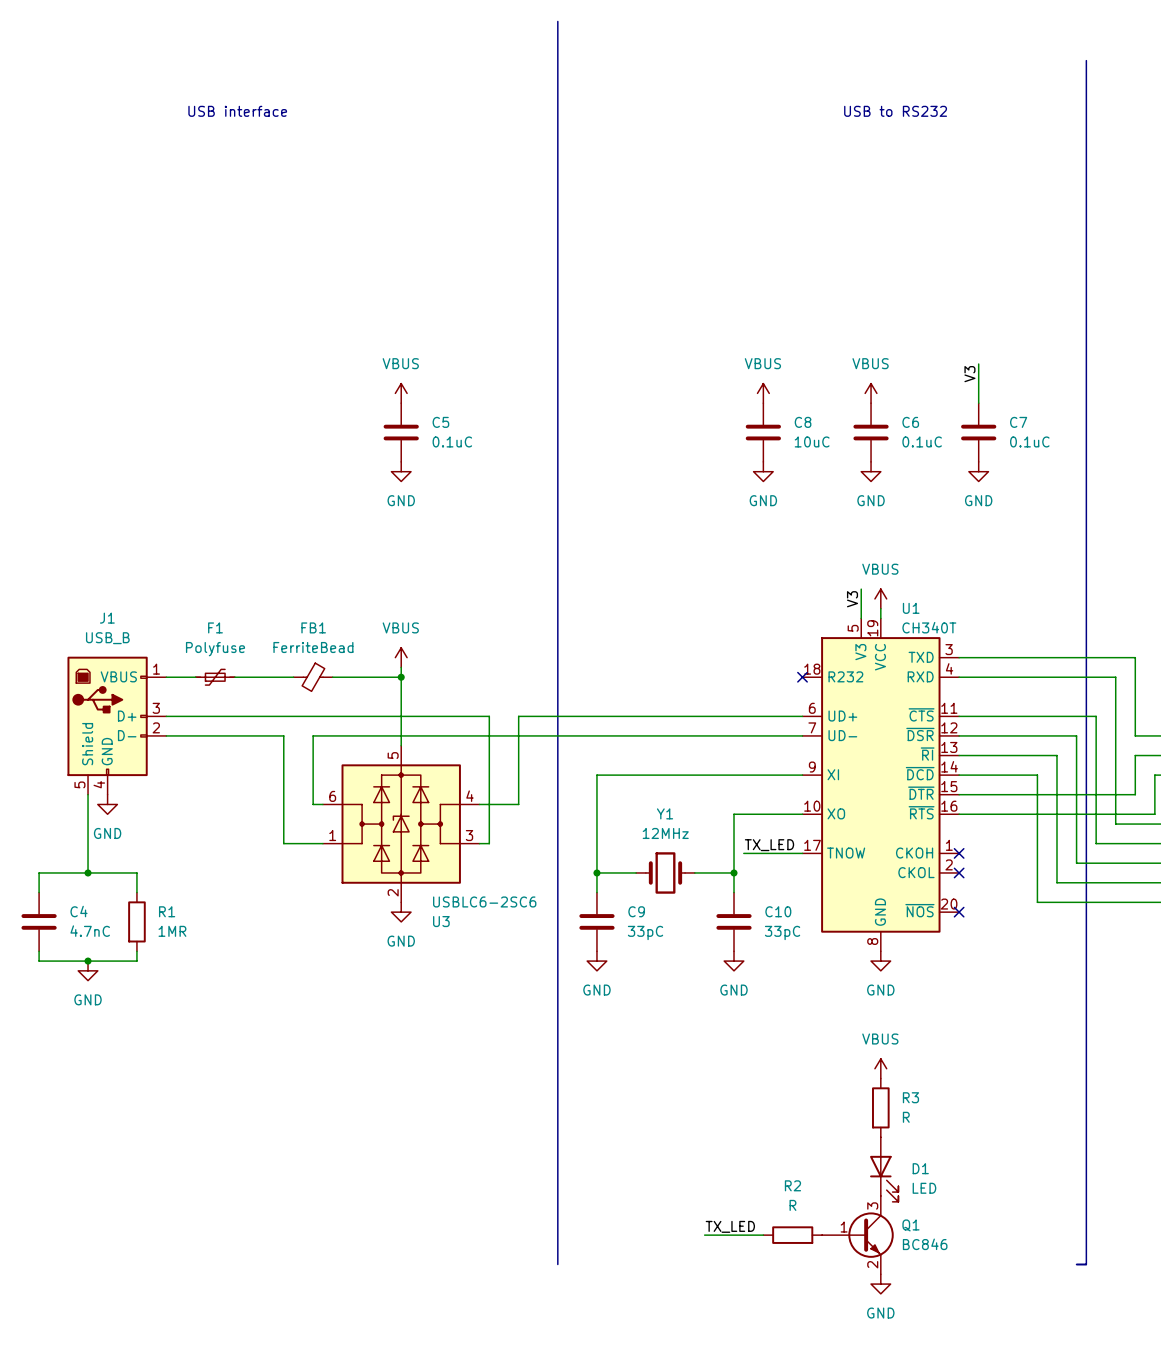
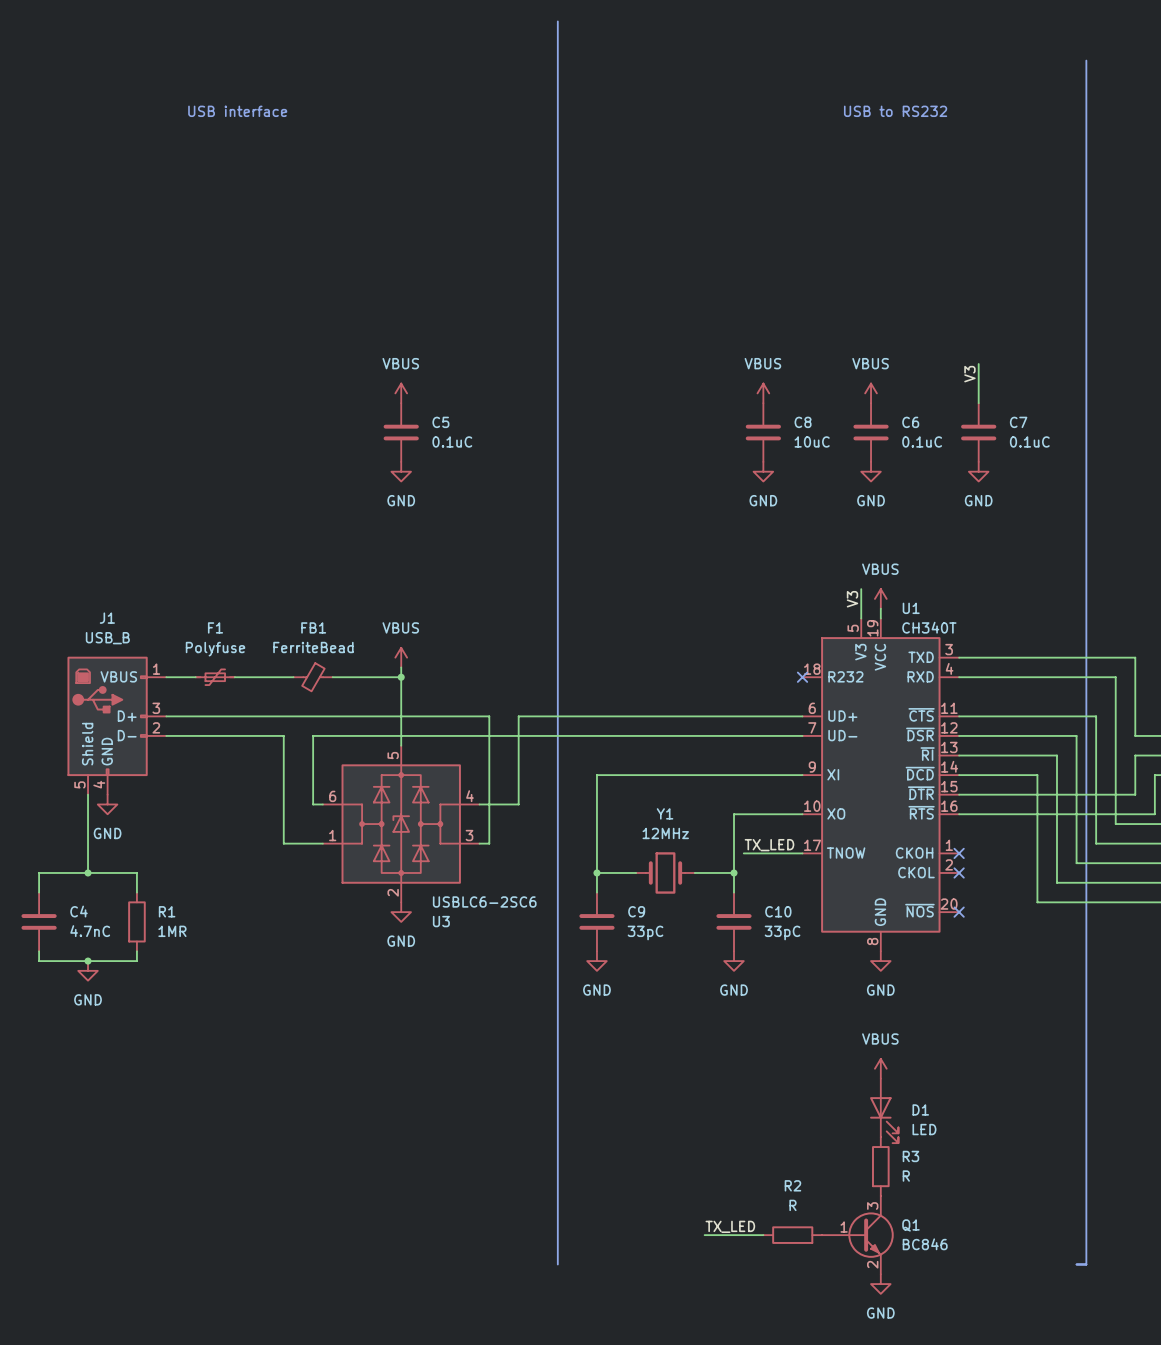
R3 position: (880, 1107) -> (880, 1166)
D1 position: (884, 1169) -> (884, 1110)

